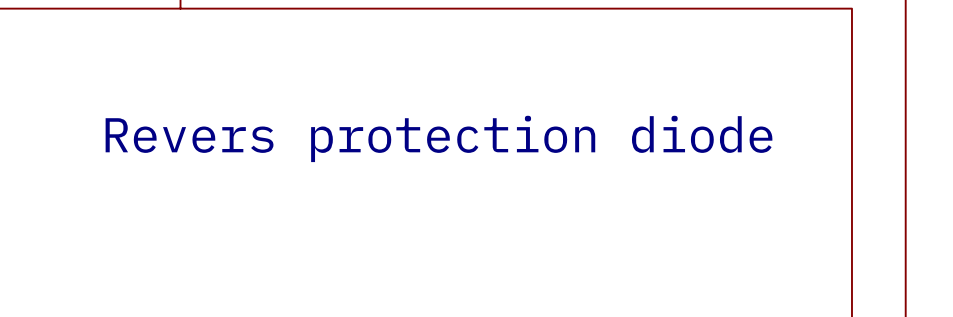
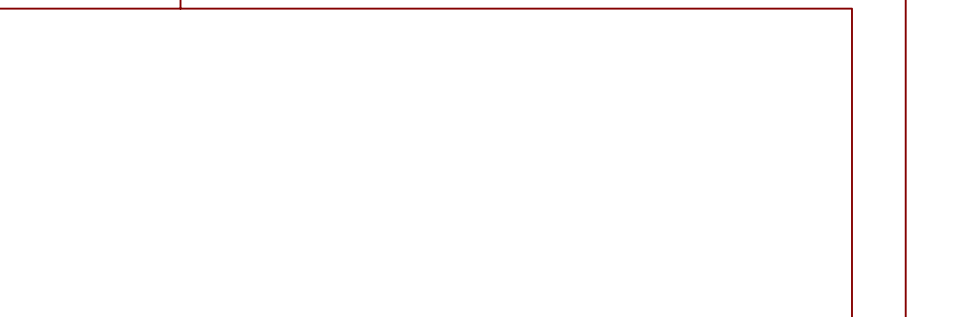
text: Revers protection diode (439, 138) -> none

